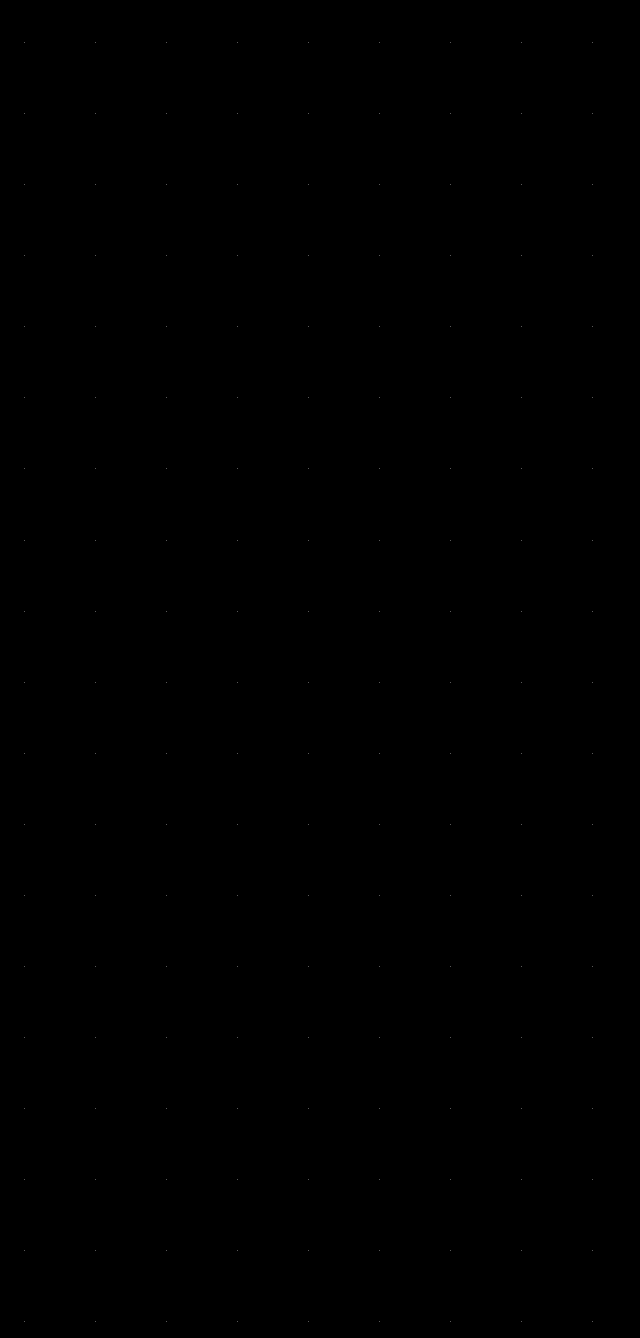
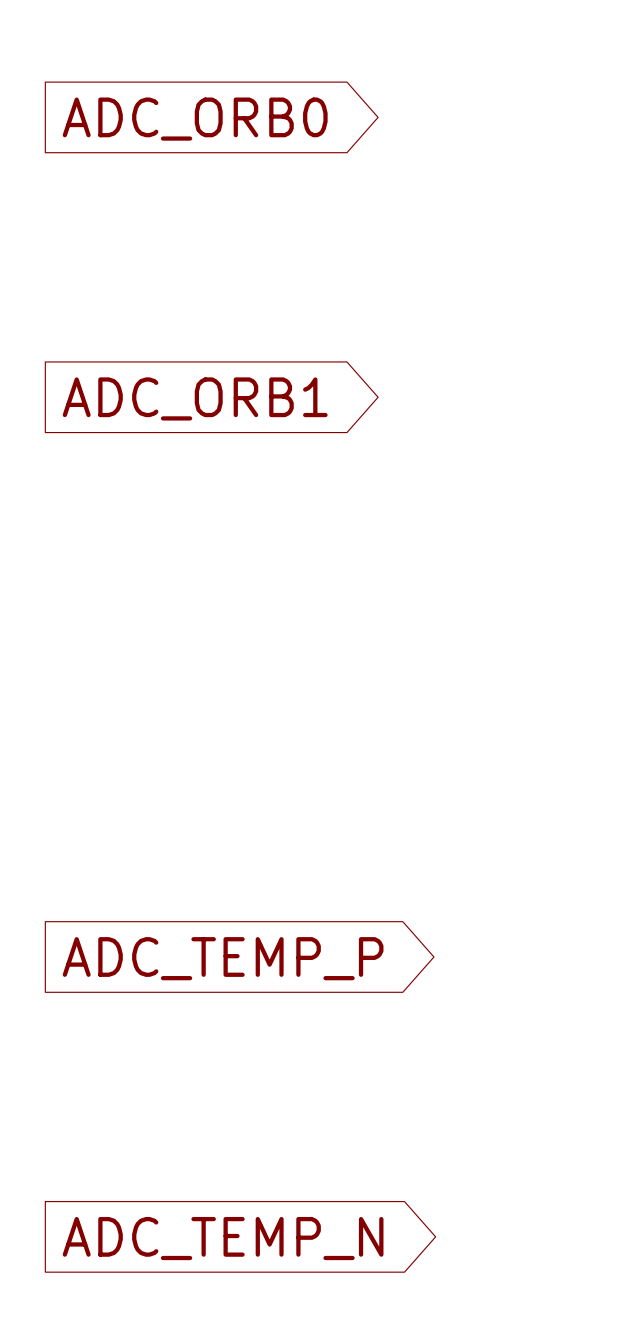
global label: none -> ADC_ORB0 (195, 119)
global label: none -> ADC_ORB1 (195, 398)
global label: none -> ADC_TEMP_P (223, 958)
global label: none -> ADC_TEMP_N (223, 1238)

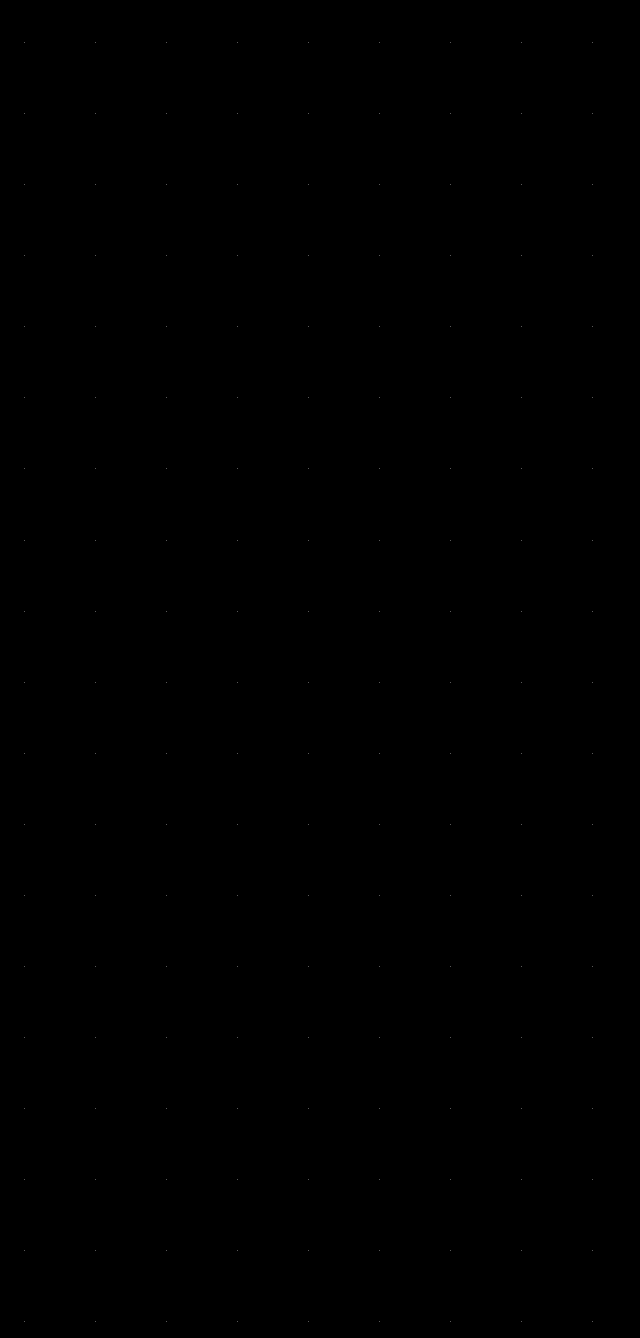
global label: ADC_ORB0 (195, 119) -> none
global label: ADC_ORB1 (195, 398) -> none
global label: ADC_TEMP_P (223, 958) -> none
global label: ADC_TEMP_N (223, 1238) -> none

